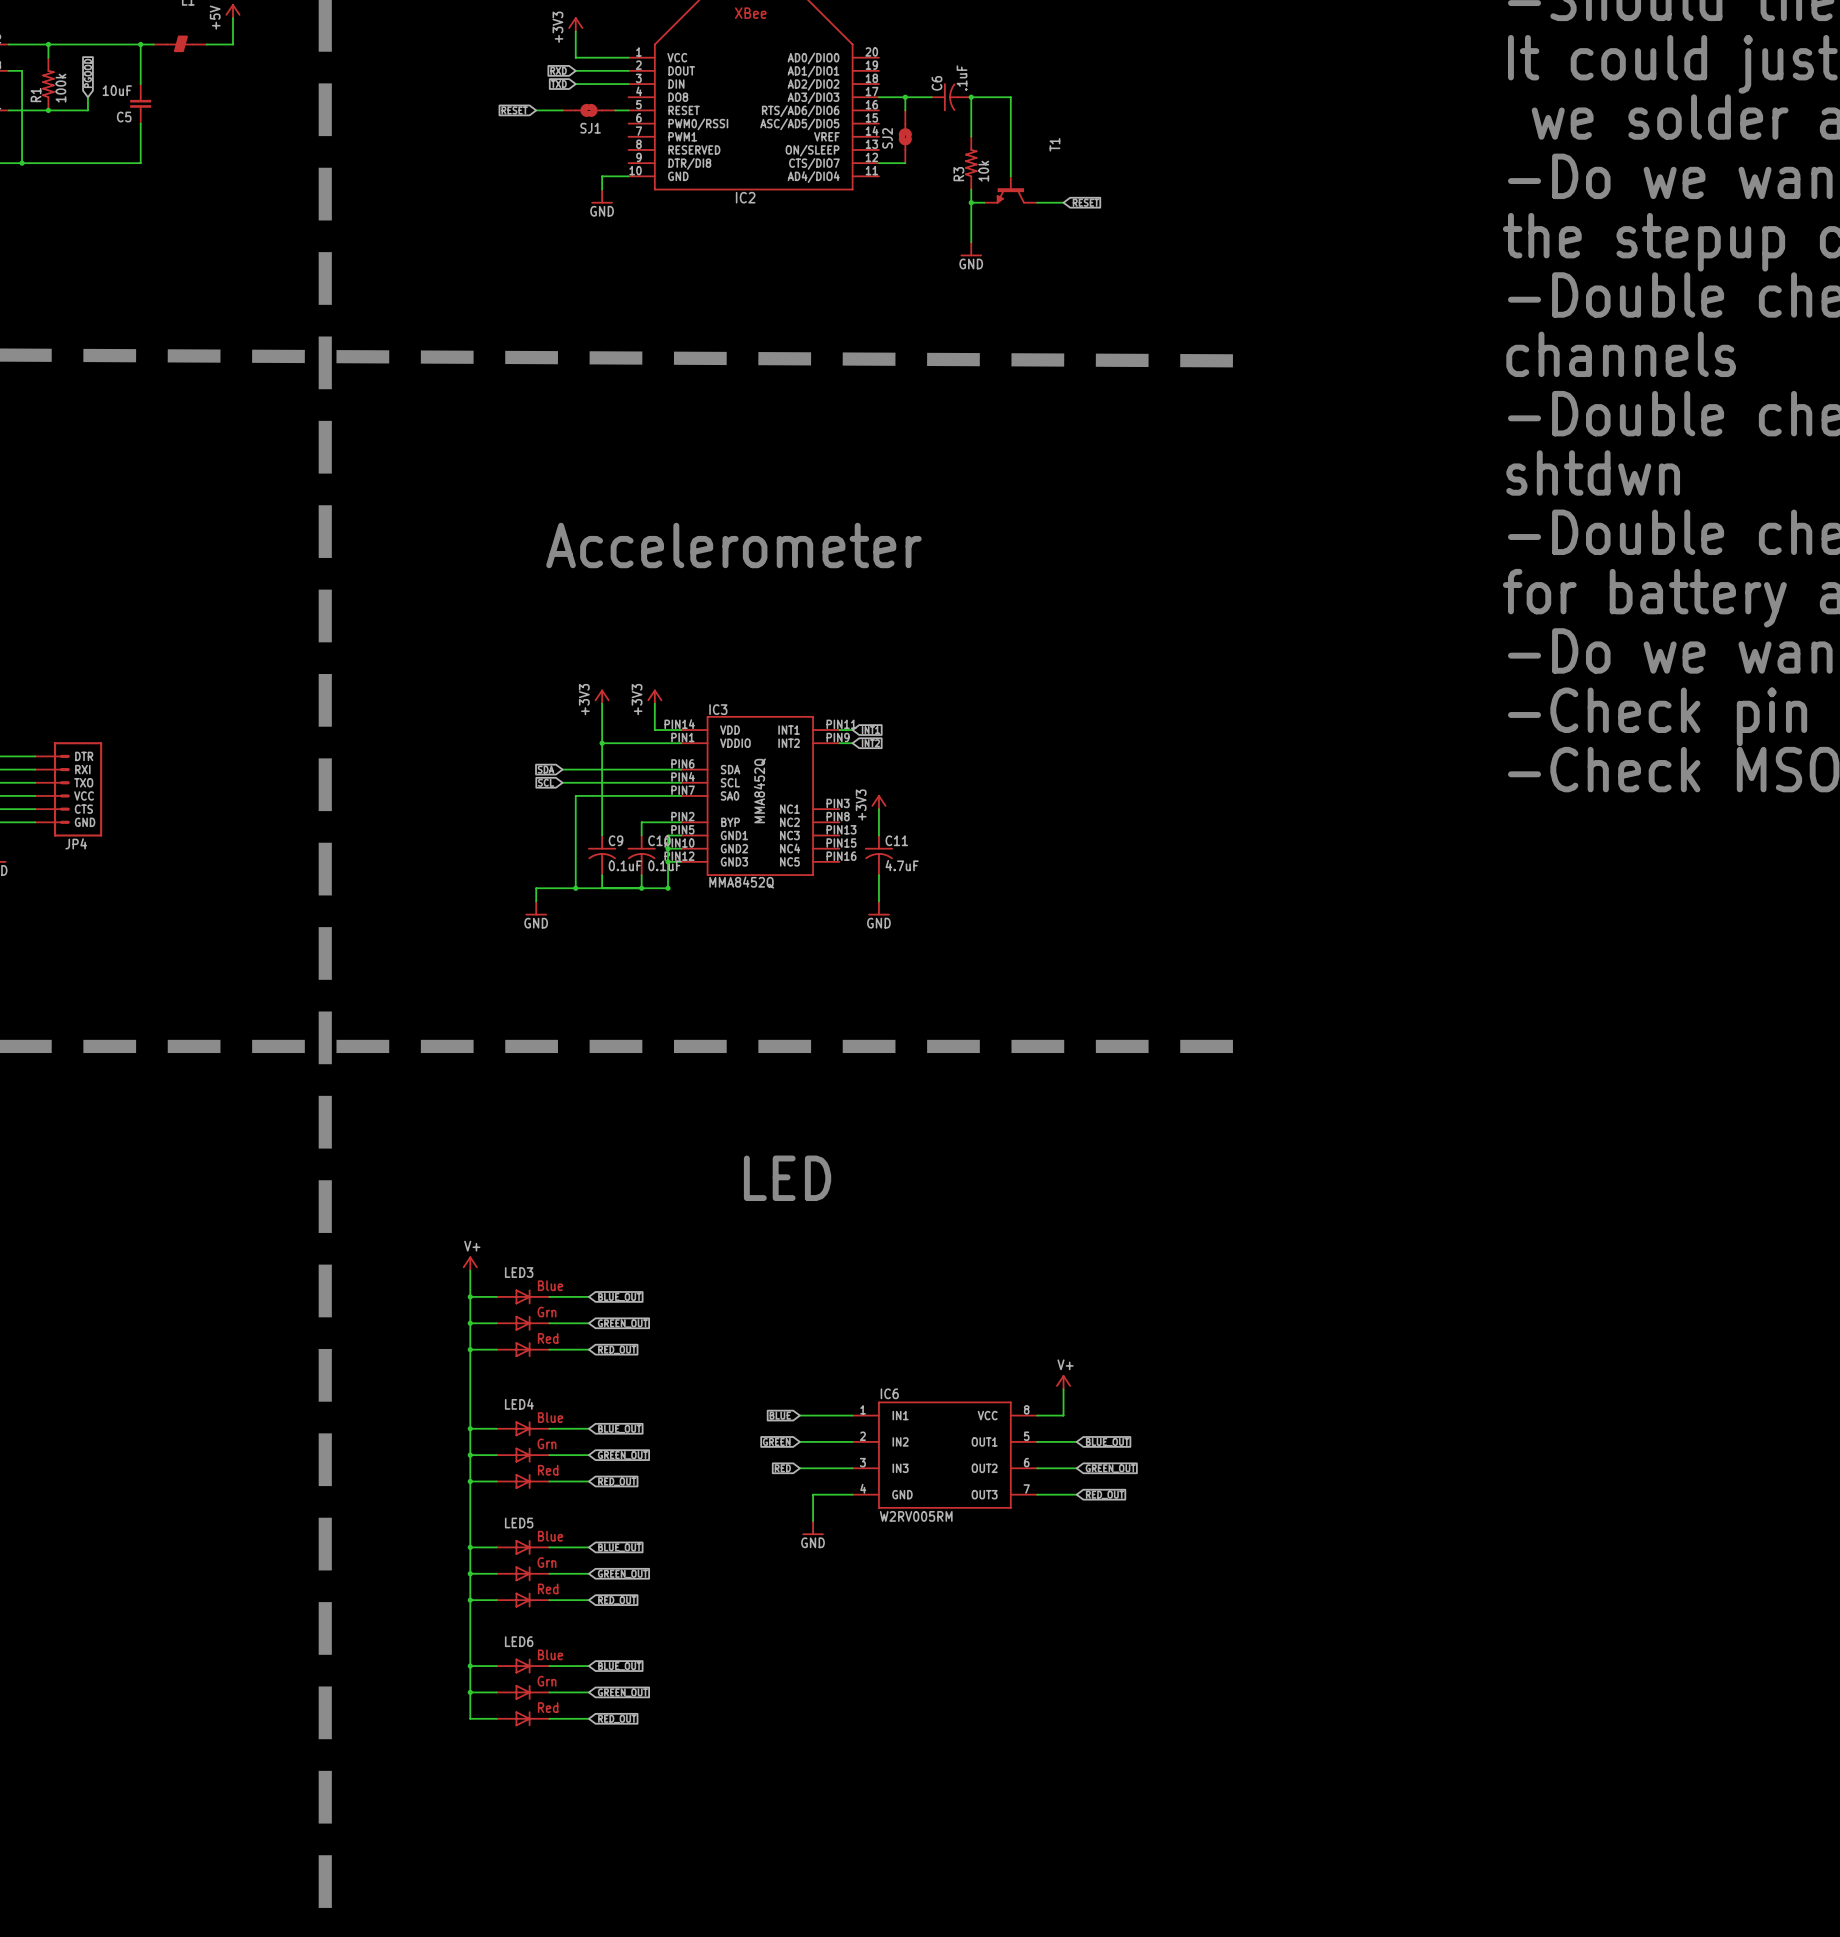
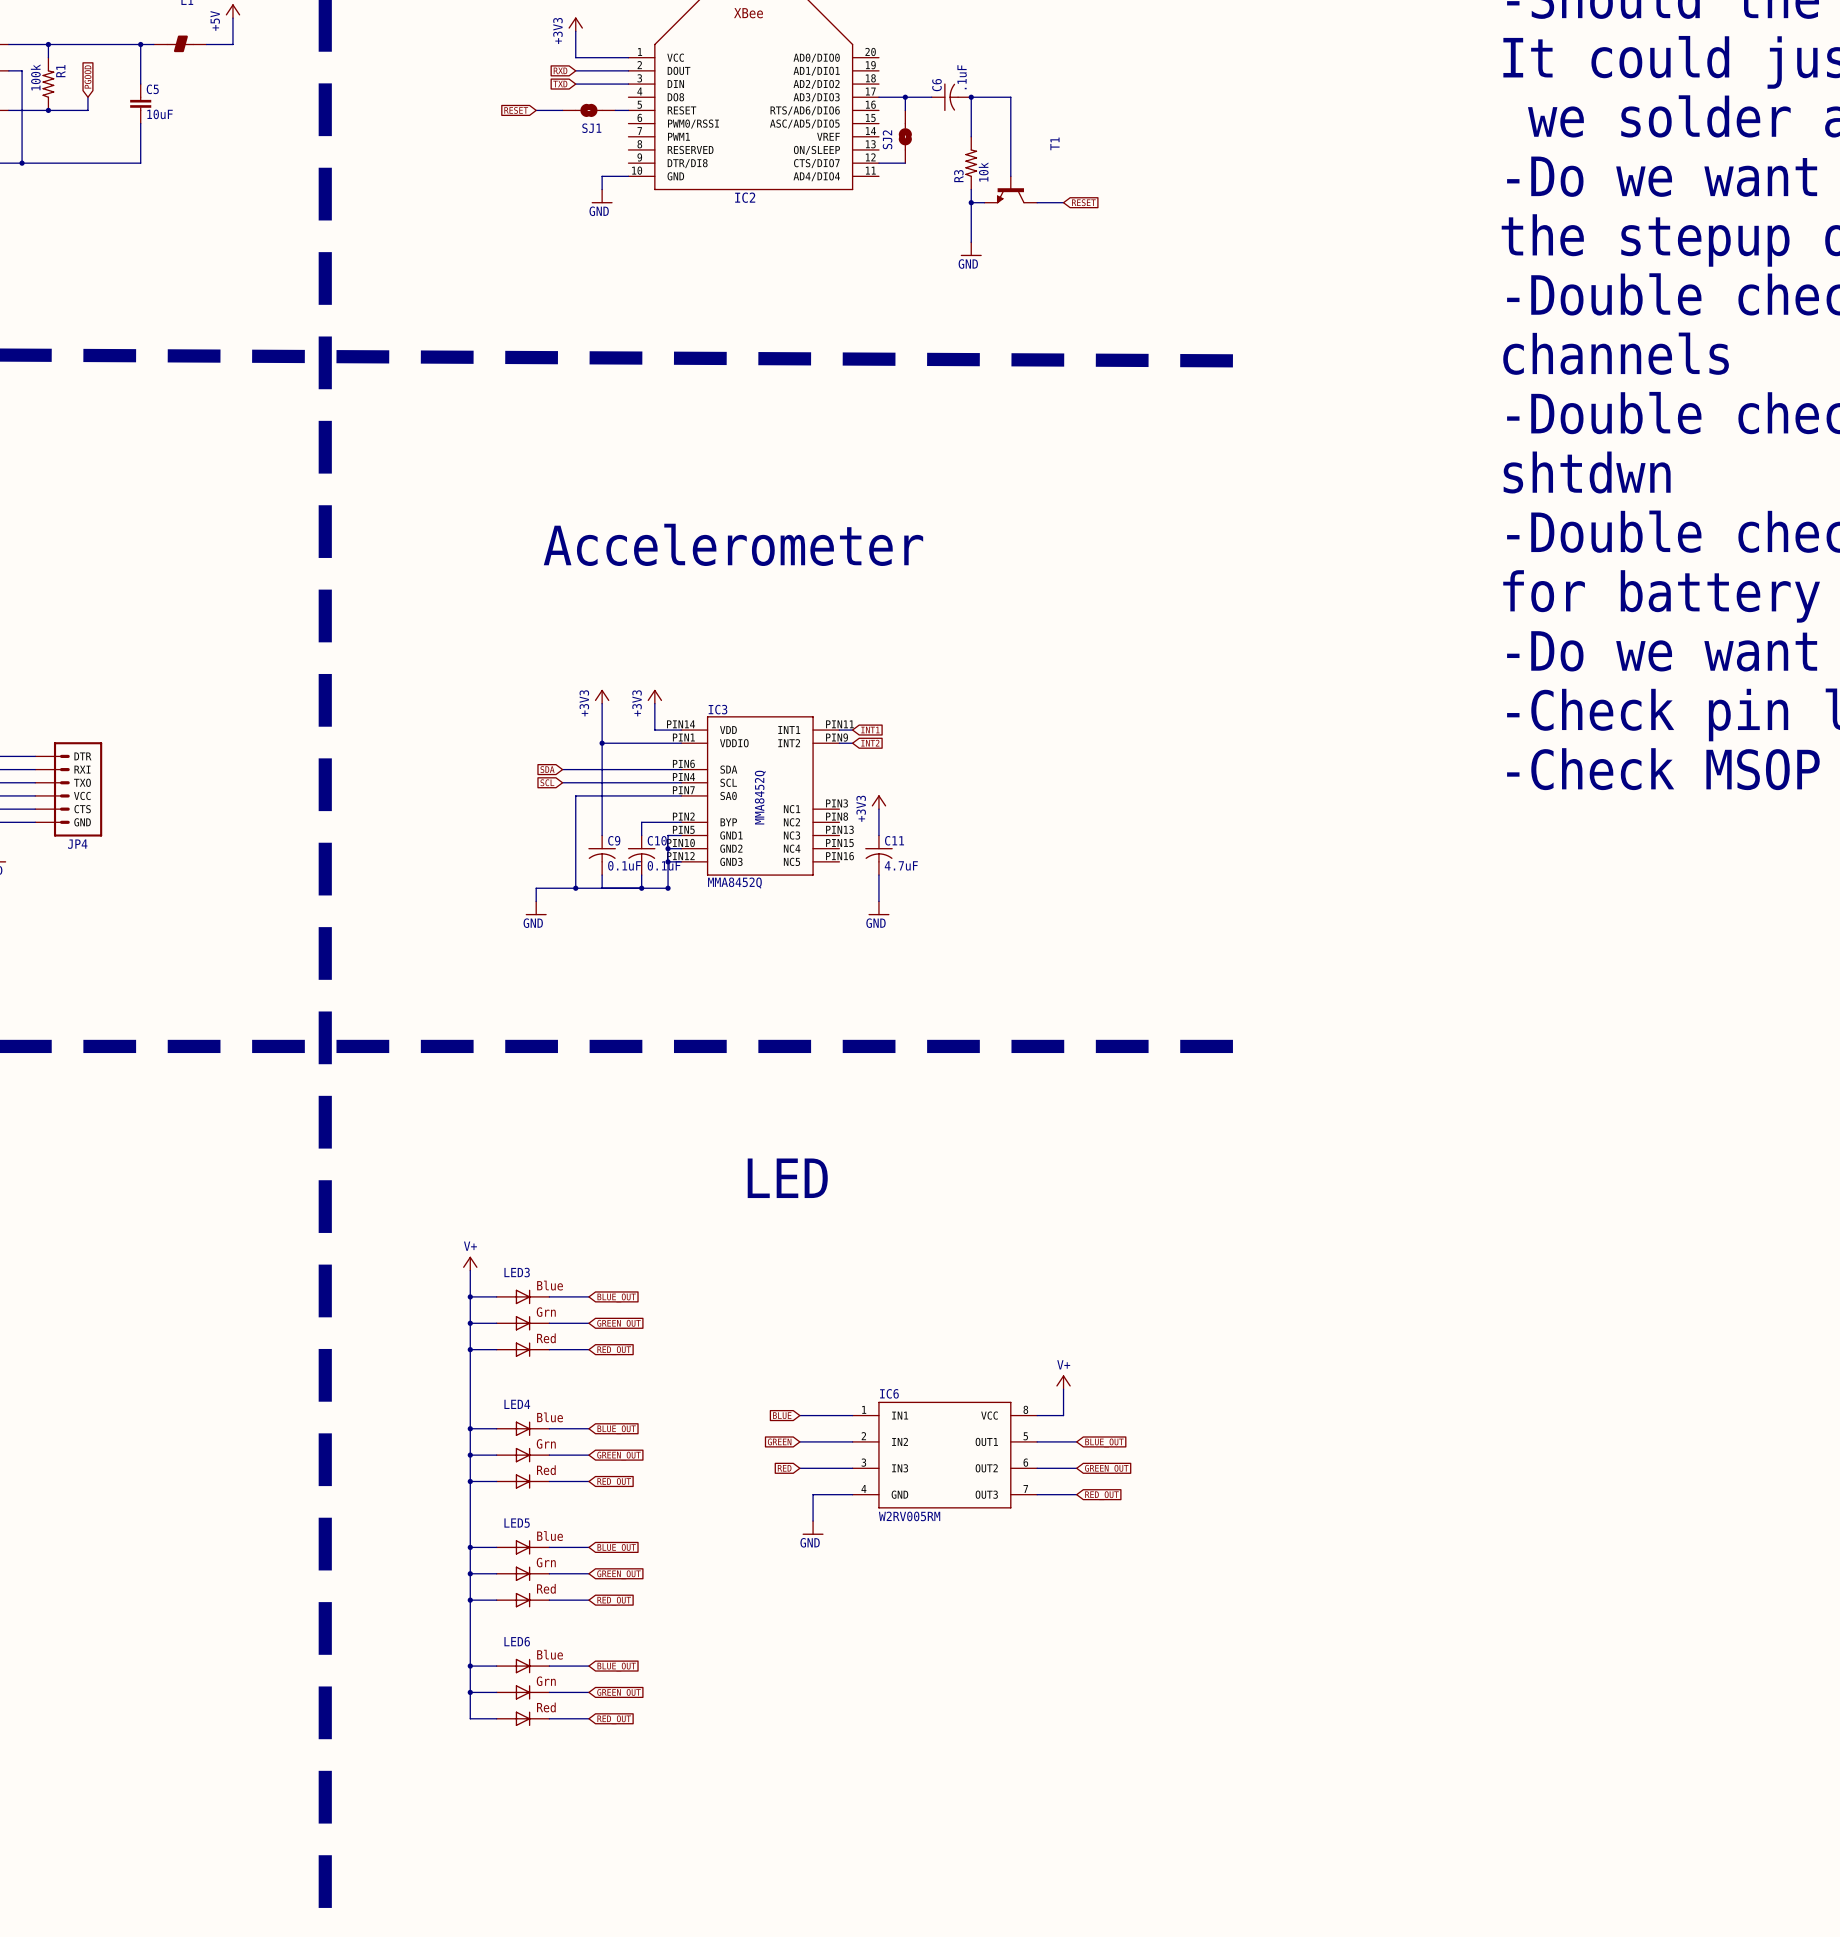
R1 value position: 100k (60, 88) -> 100k (35, 77)
C5 value position: 10uF (117, 90) -> 10uF (160, 114)
R1 name position: R1 (36, 95) -> R1 (60, 71)
C5 name position: C5 (124, 117) -> C5 (152, 89)

